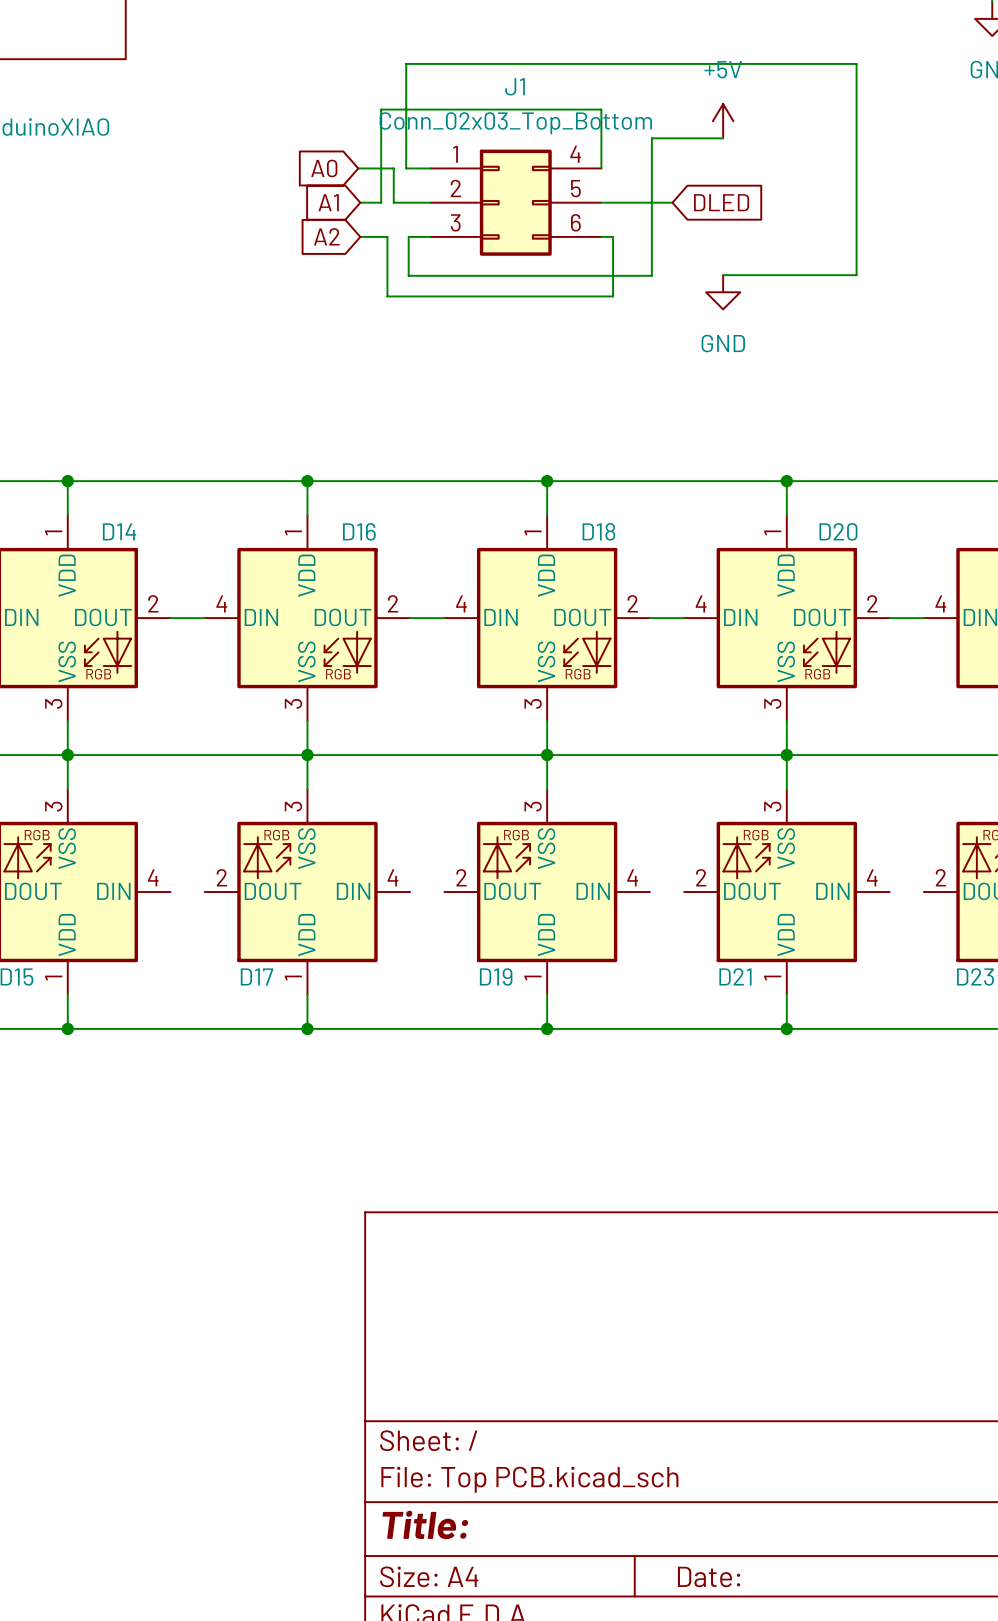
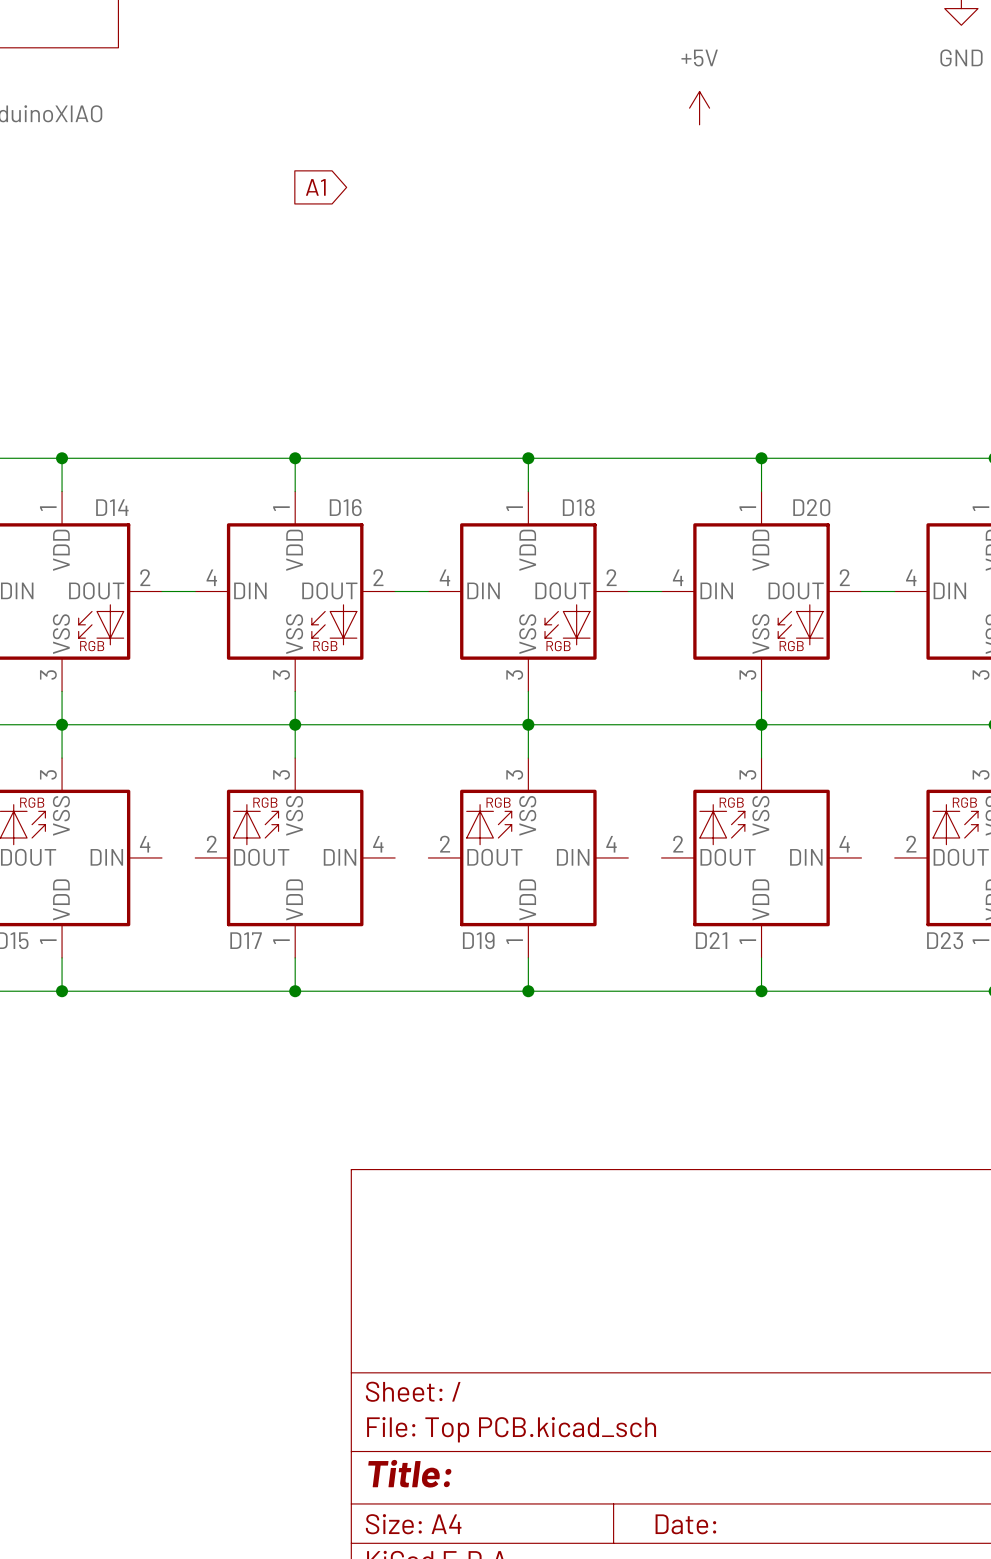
wire: (723, 138) (651, 138) (651, 275) (408, 275) (408, 236) (430, 236) -> none
global label: A0 (324, 168) -> none
wire: (358, 168) (393, 168) (393, 202) (430, 202) -> none
wire: (430, 168) (406, 168) (406, 63) (856, 63) (856, 275) (723, 275) -> none
wire: (601, 168) (601, 109) (381, 109) (381, 202) (360, 202) -> none
J1: Conn_02x03_Top_Bottom (515, 202) -> none
wire: (601, 202) (672, 202) -> none
global label: DLED (721, 202) -> none
global label: A2 (326, 236) -> none
wire: (360, 236) (387, 236) (387, 296) (613, 296) (613, 236) (601, 236) -> none
power symbol: GND (723, 292) -> none

